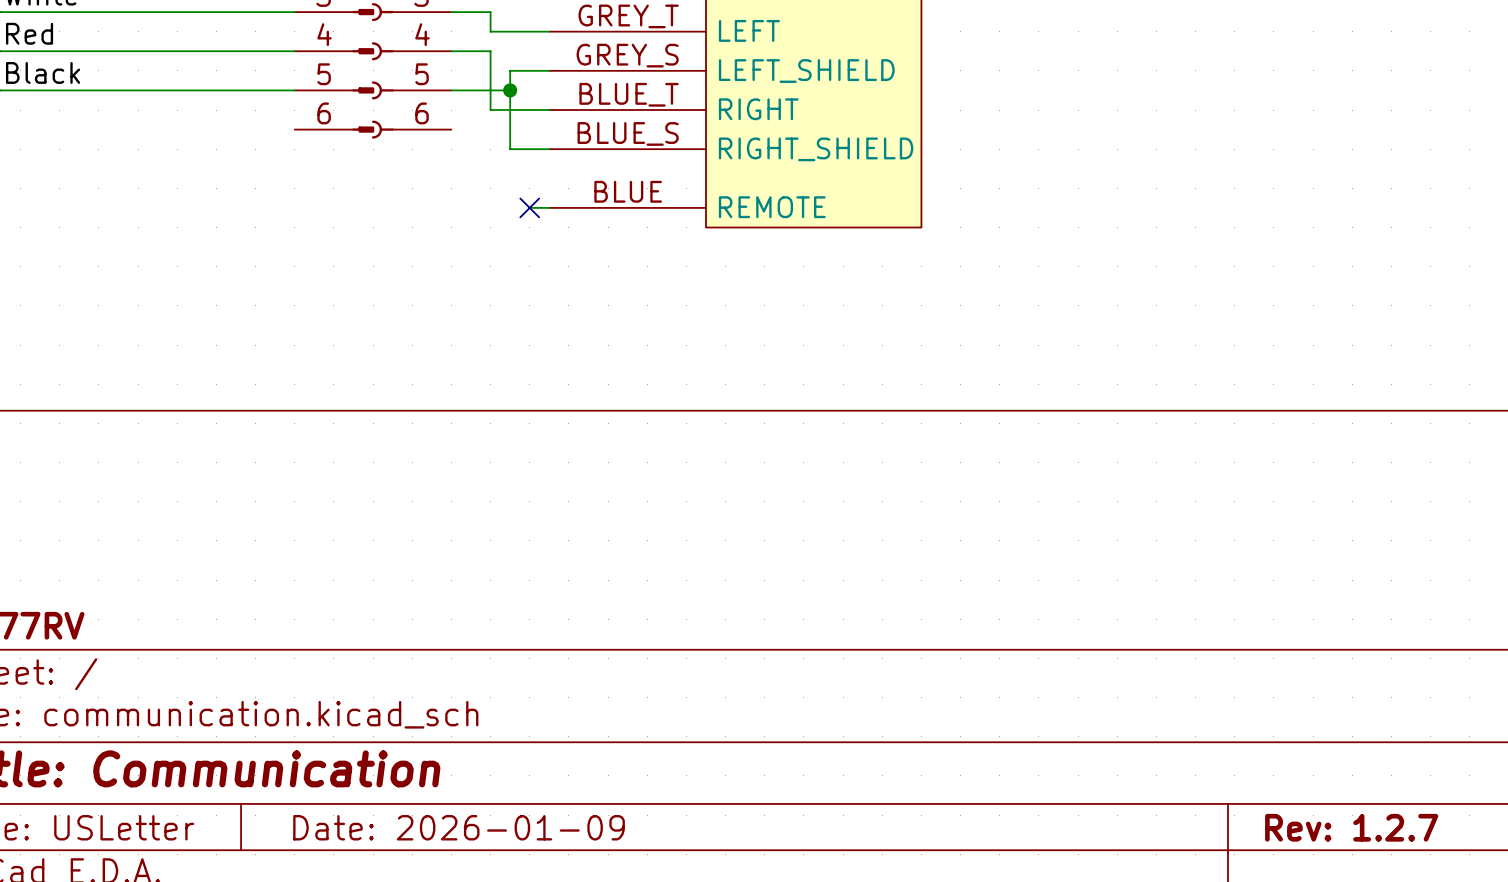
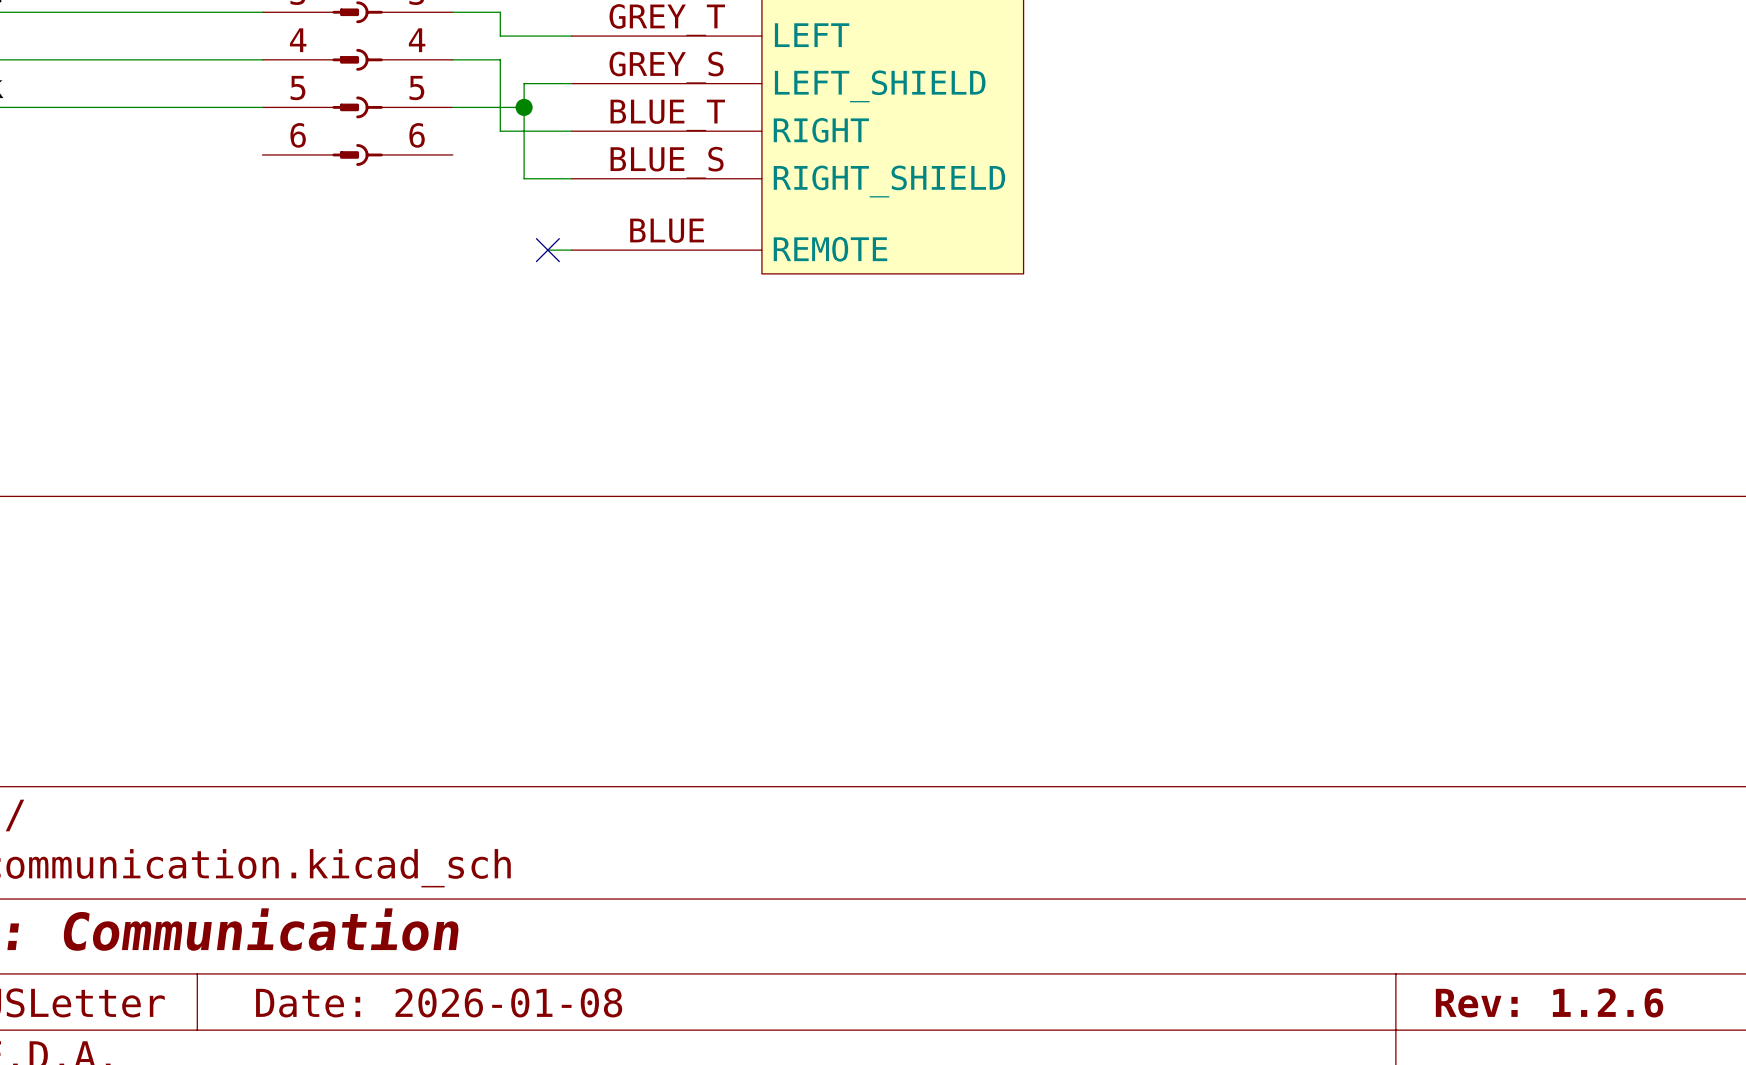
title block: Date: 2026-01-09 (459, 827) -> Date: 2026-01-08 (439, 1002)
title block: Rev: 1.2.7 (1351, 827) -> Rev: 1.2.6 (1549, 1002)

